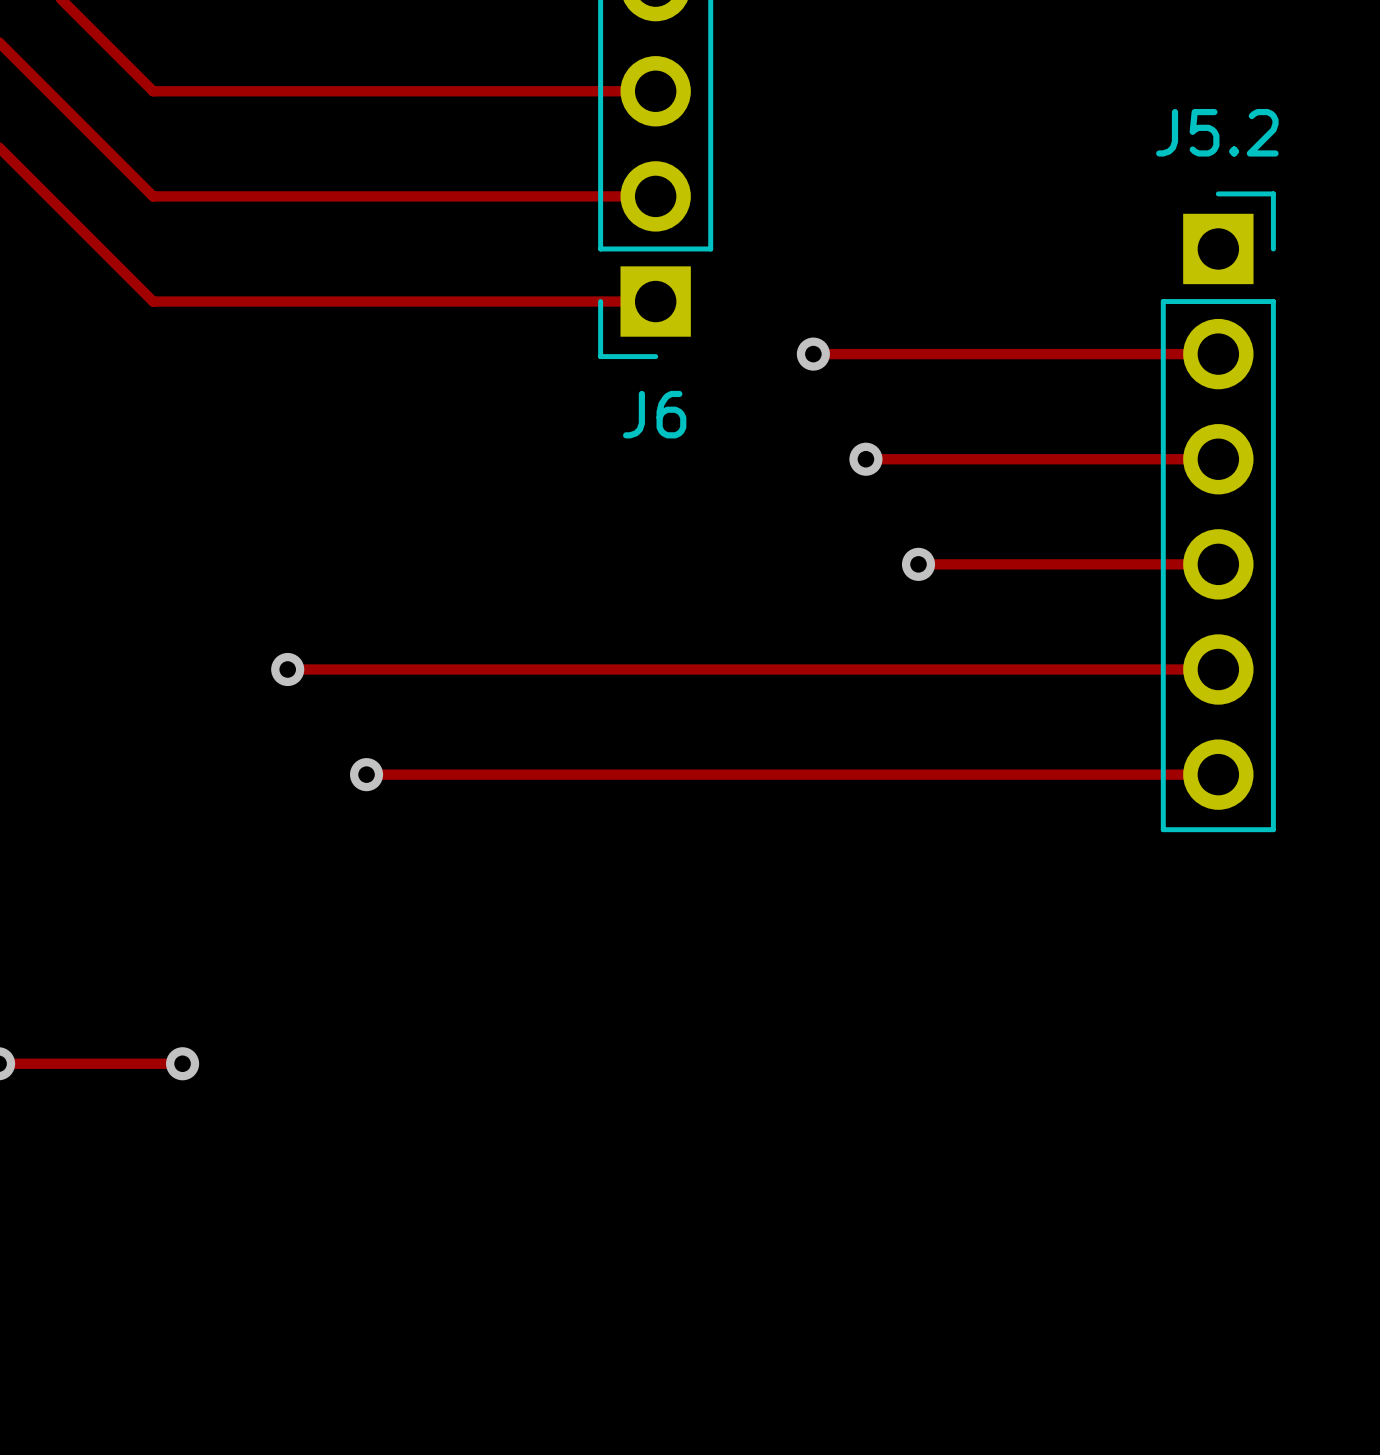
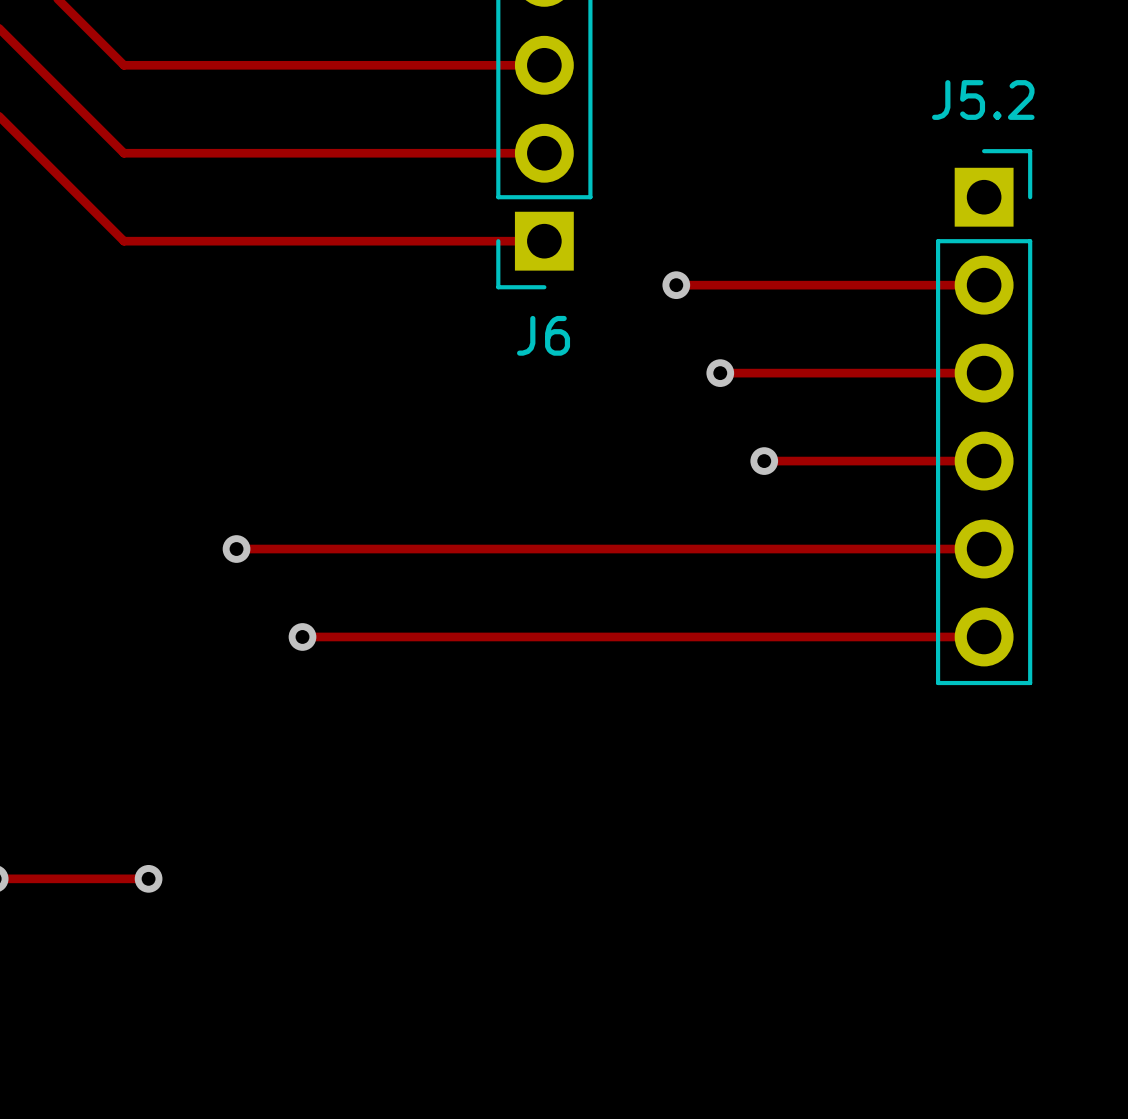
J5.2 position: (1218, 511) -> (984, 417)

